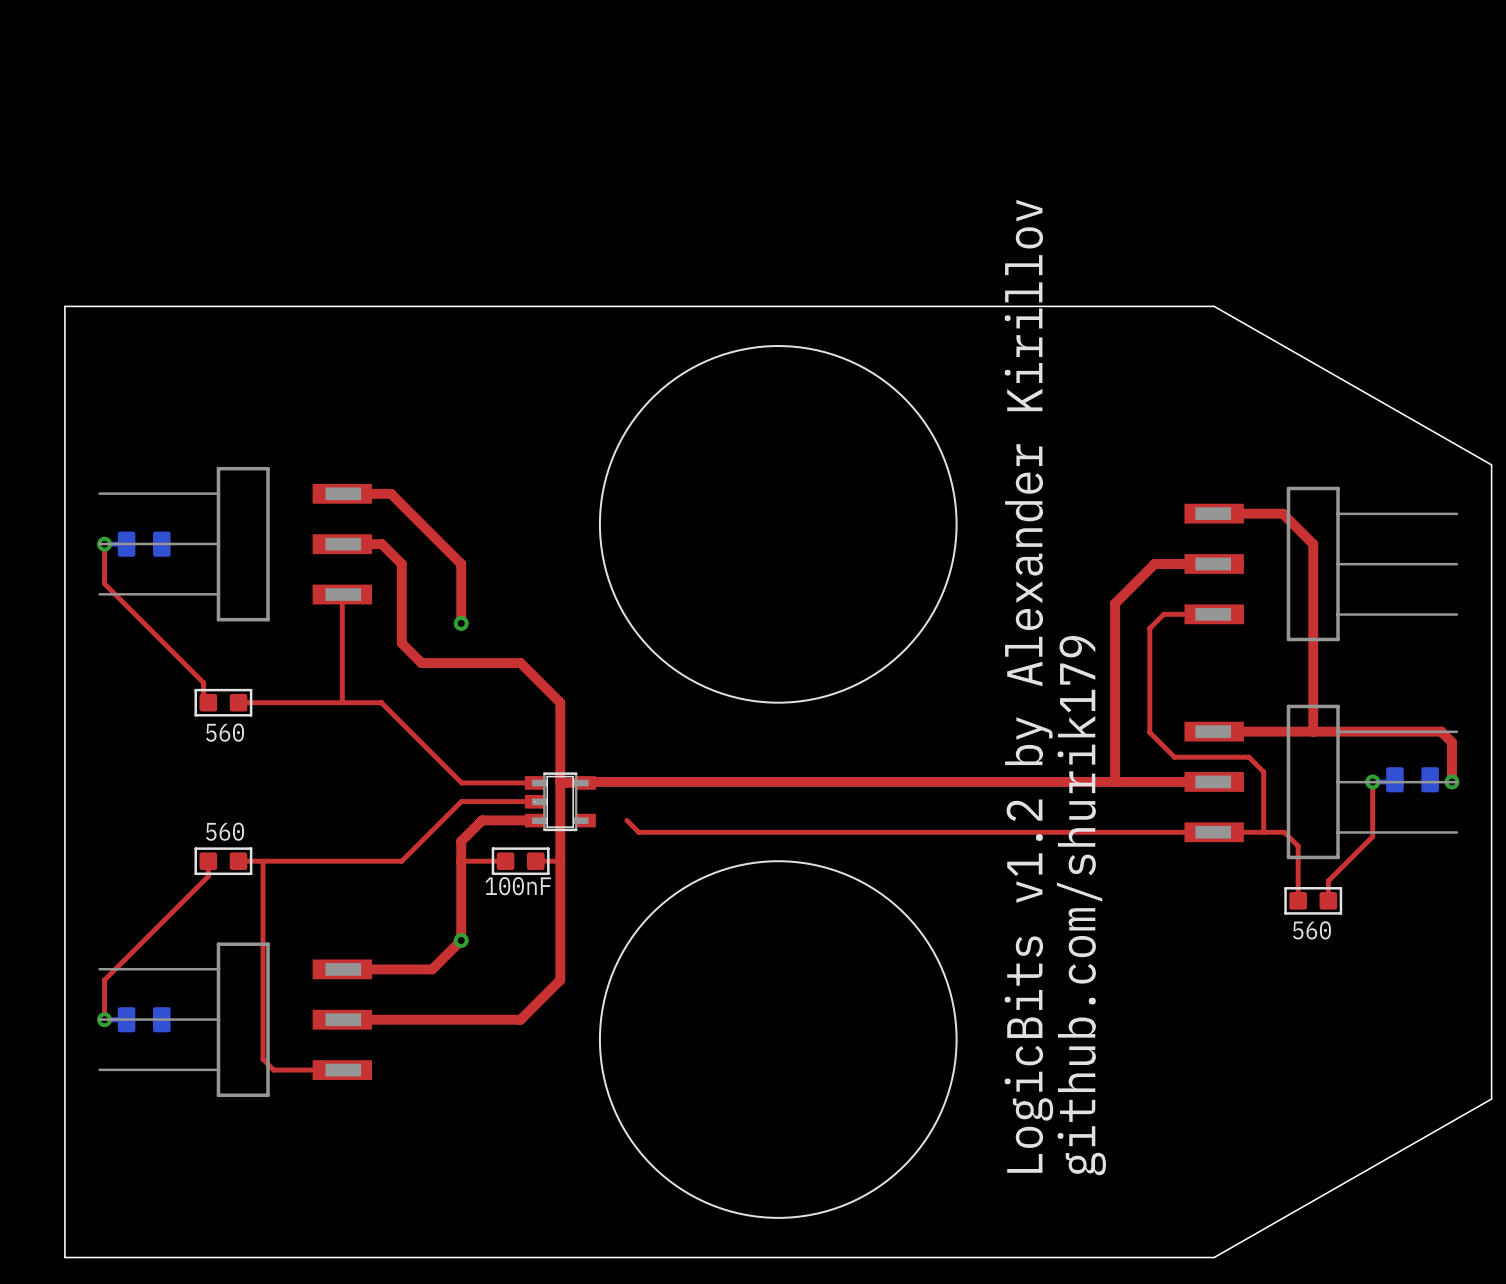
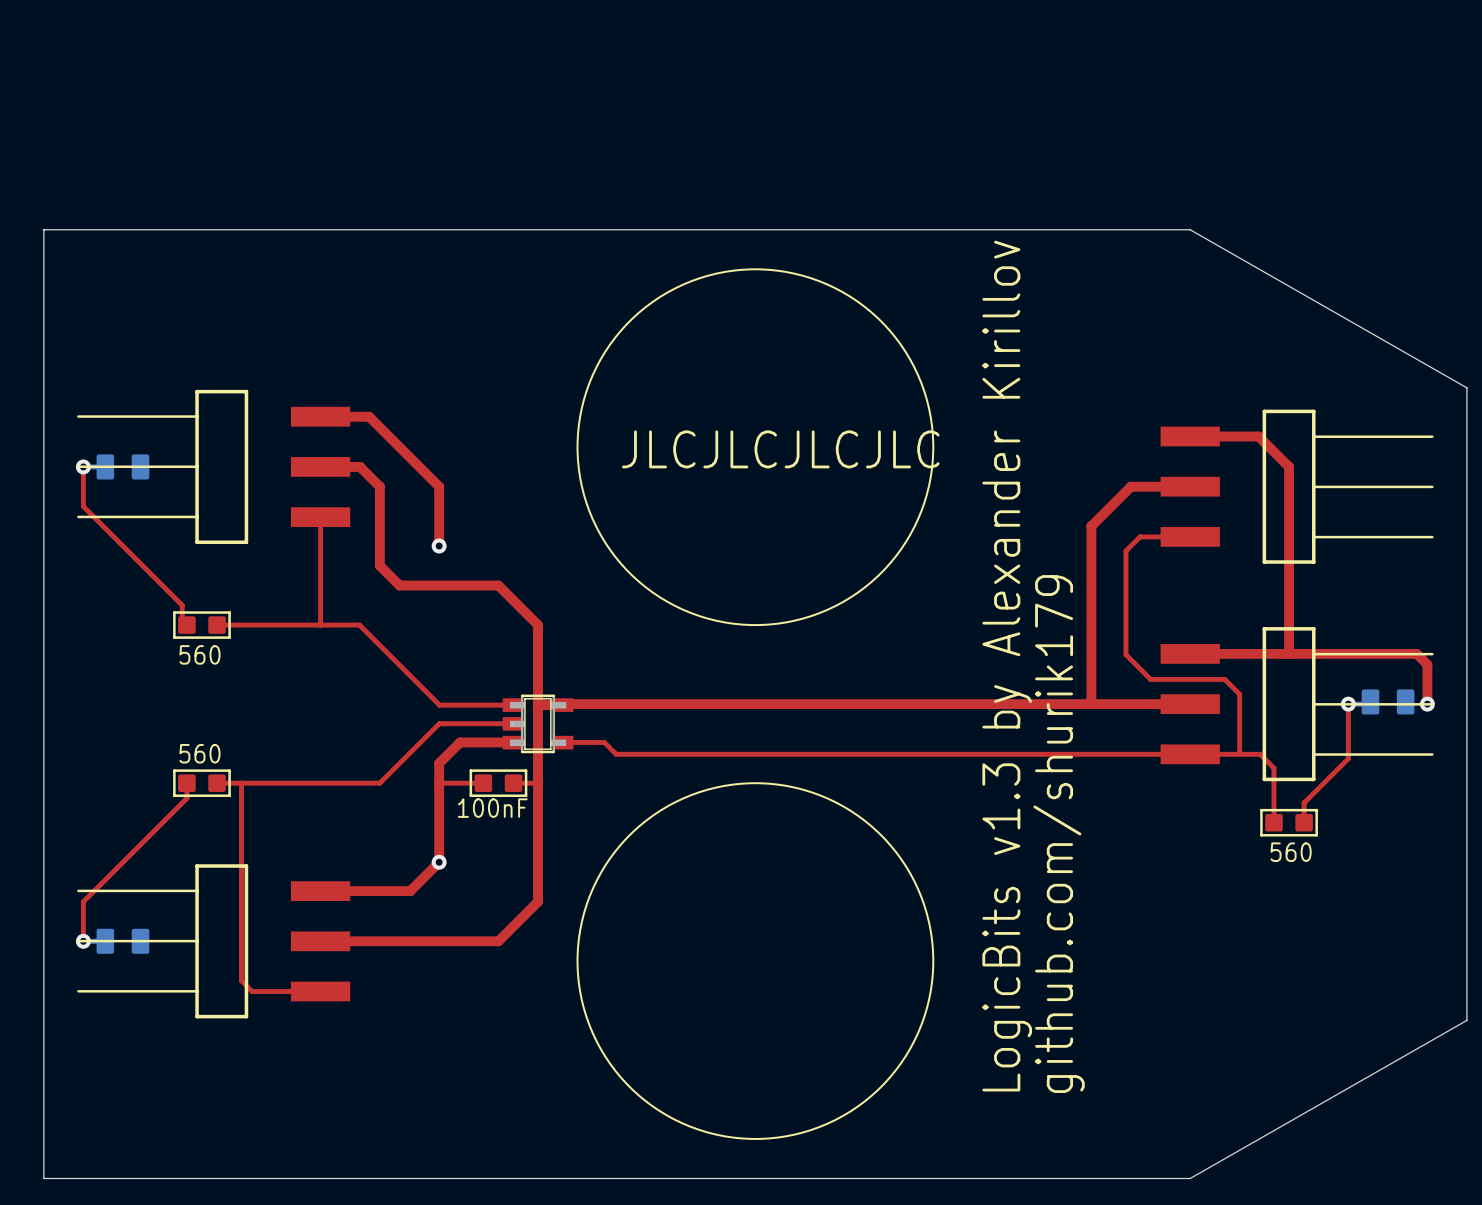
part footprint: [98, 466, 373, 622] -> [77, 389, 351, 545]
part footprint: [1184, 486, 1459, 642] -> [1160, 409, 1434, 564]
text: none -> JLCJLCJLCJLC (780, 449)
text: LogicBits v1.2 by Alexander Kirillov (1028, 686) -> LogicBits v1.3 by Alexander Kirillov (1007, 666)
part footprint: [1184, 704, 1459, 860] -> [1160, 627, 1434, 782]
top track: none -> (563, 742) (604, 742)
part footprint: [98, 942, 373, 1097] -> [77, 864, 351, 1019]

